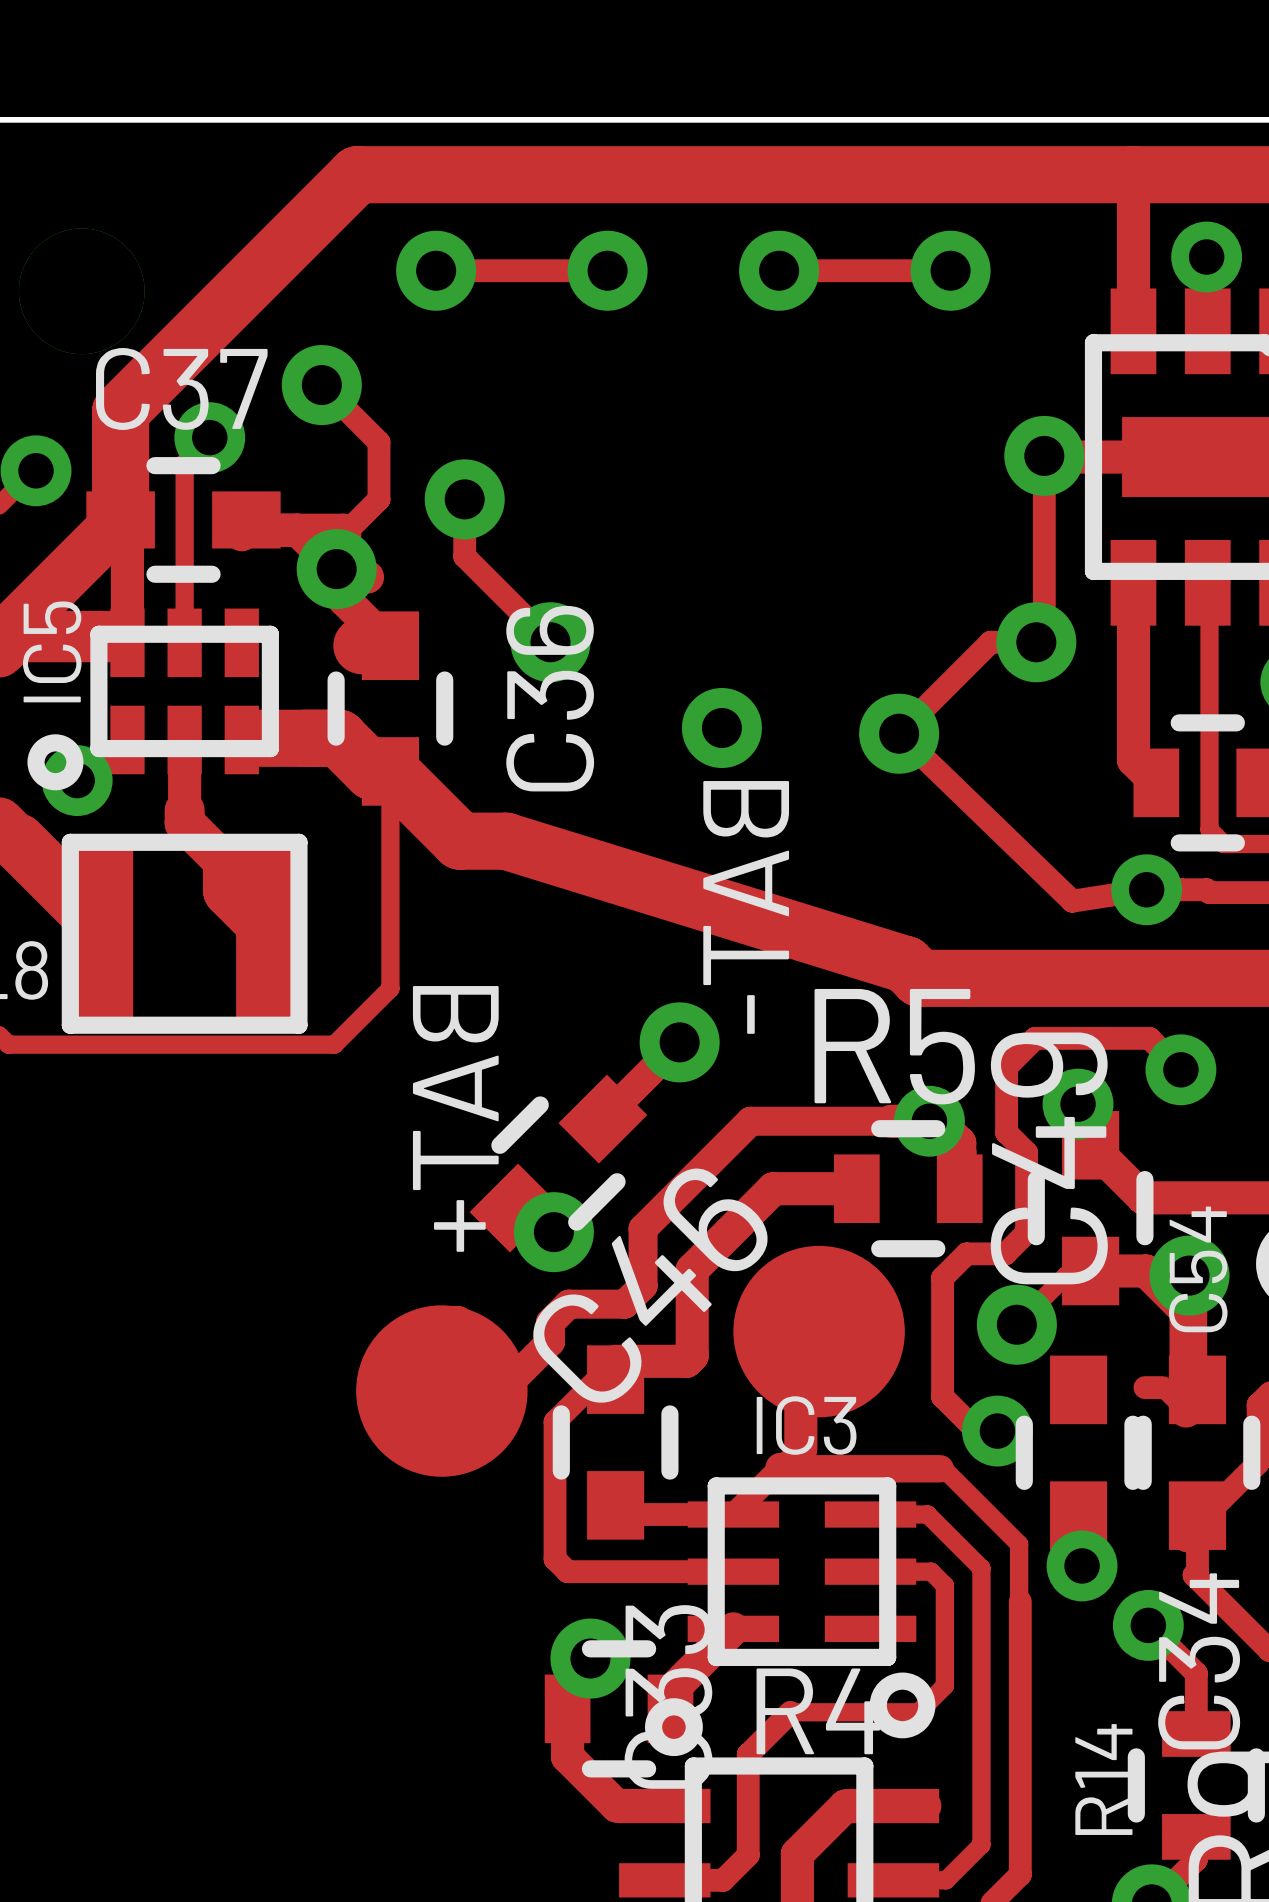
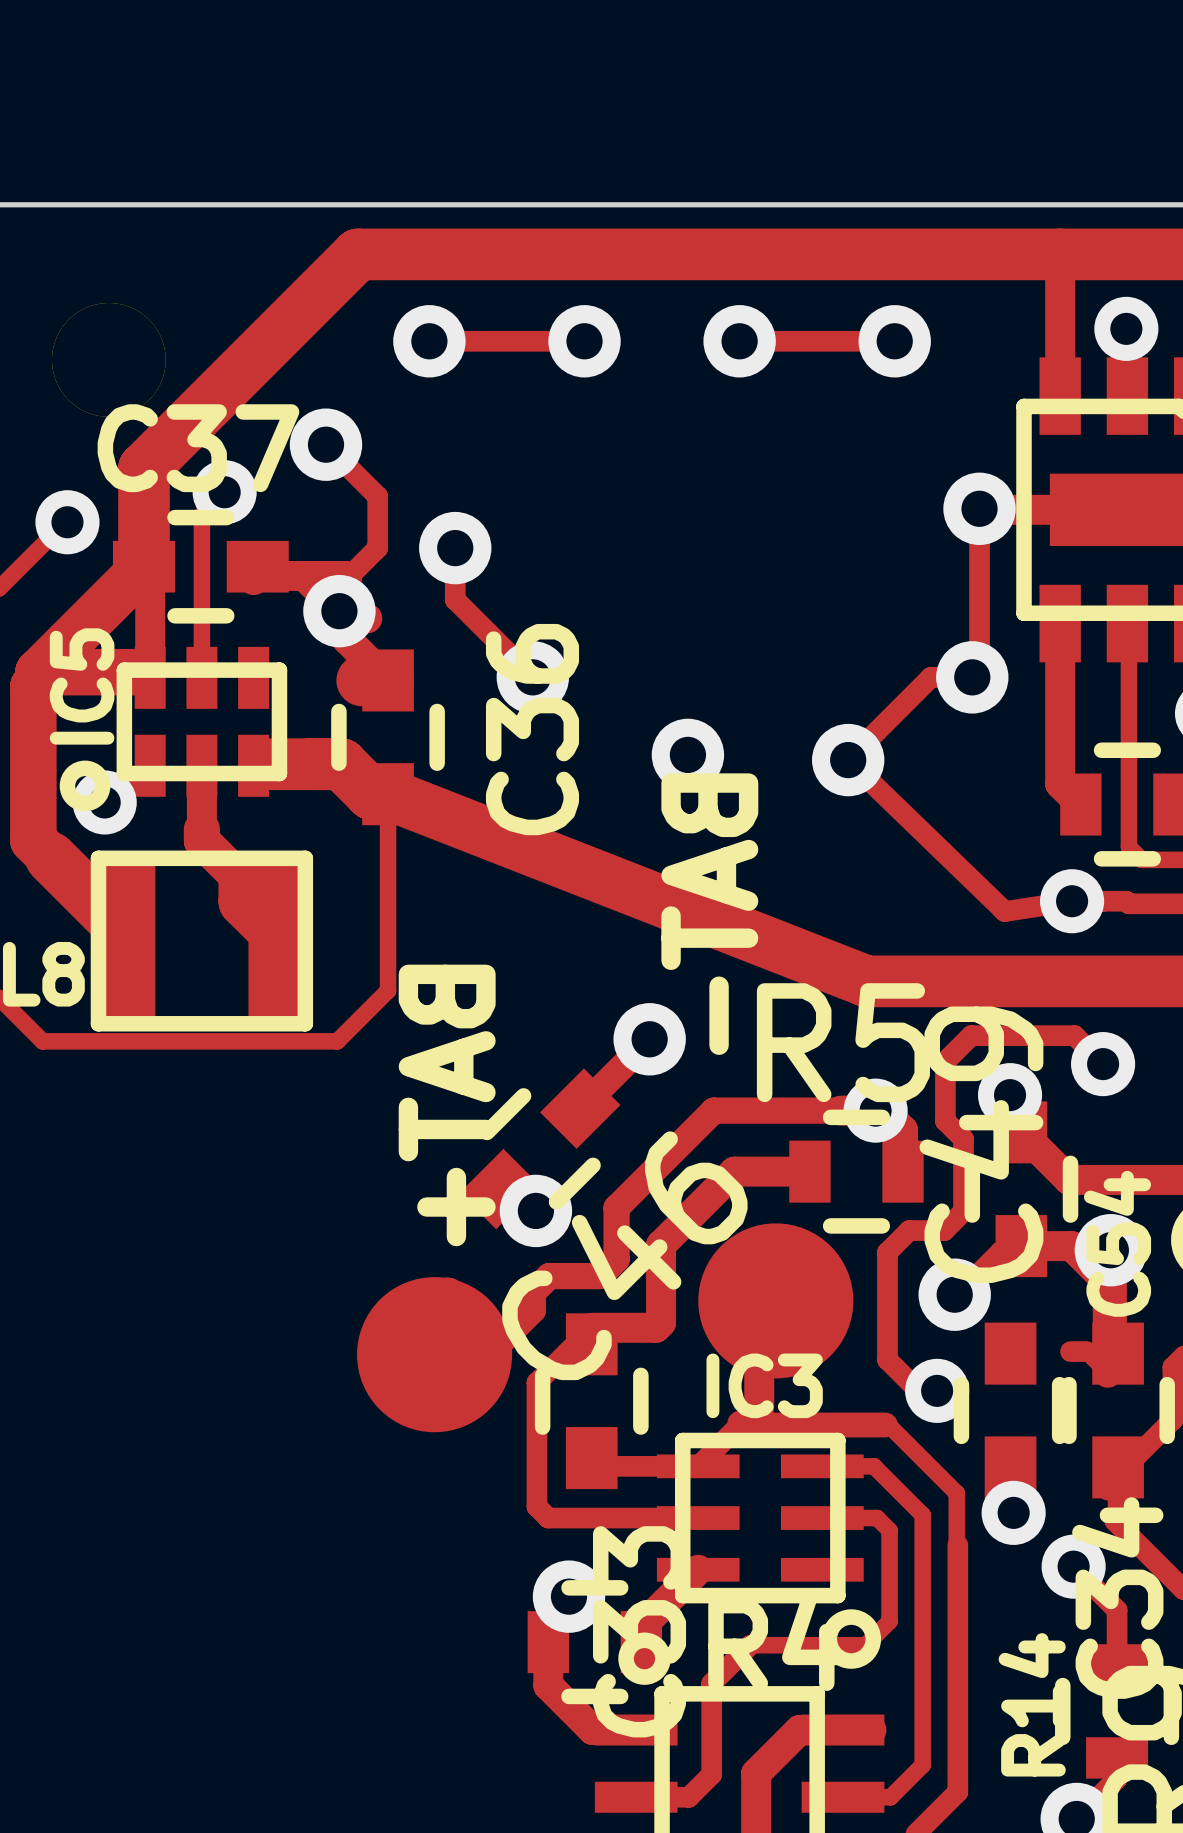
track: (390, 771) (460, 841) (505, 841) (905, 964) (919, 978) -> (388, 794) (866, 981)

